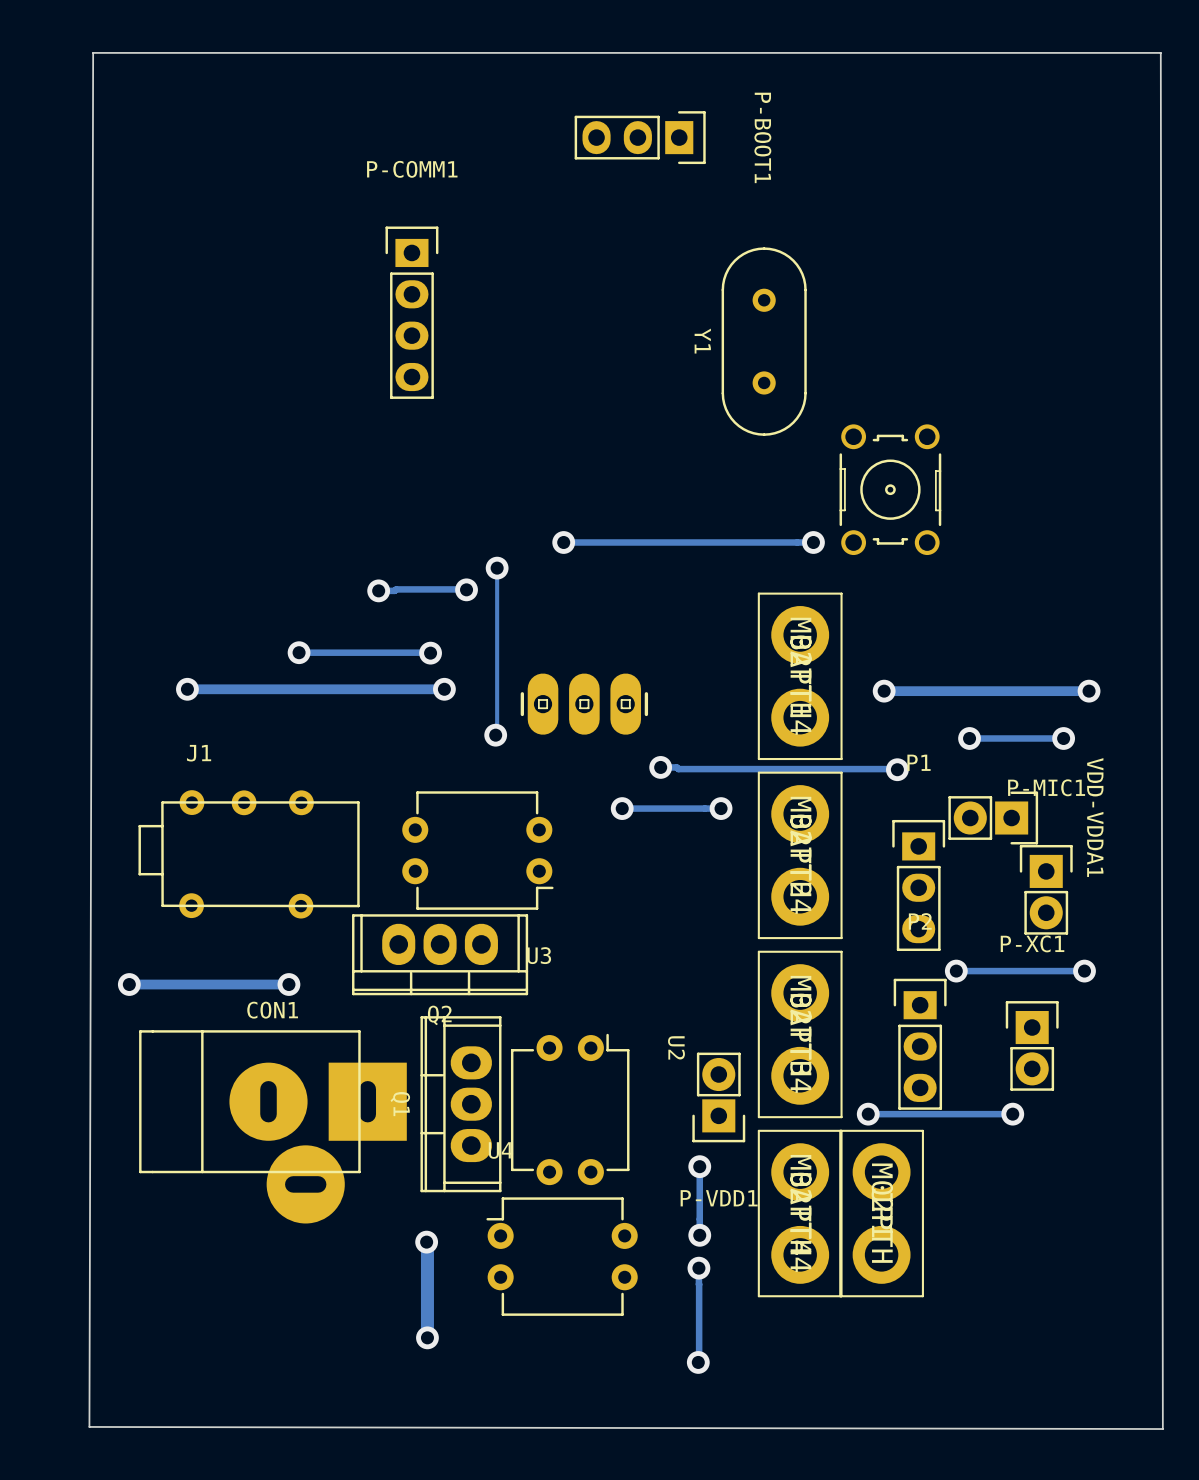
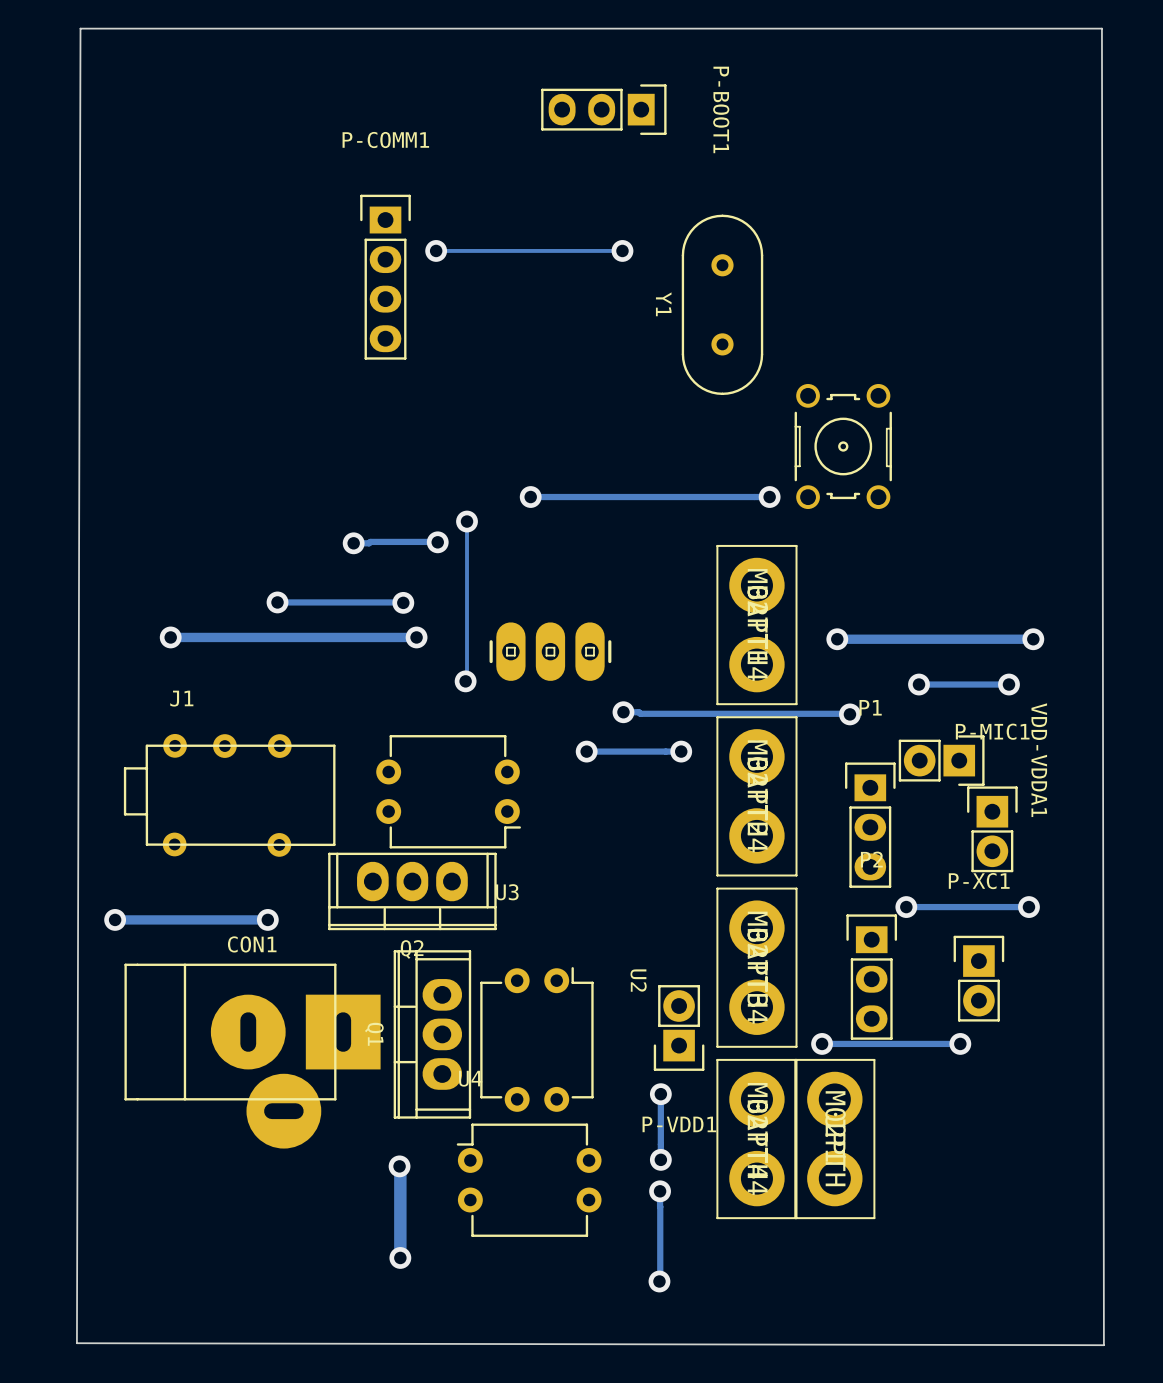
via: none -> (436, 250)
track: none -> (622, 250) (436, 250)
via: none -> (622, 250)

